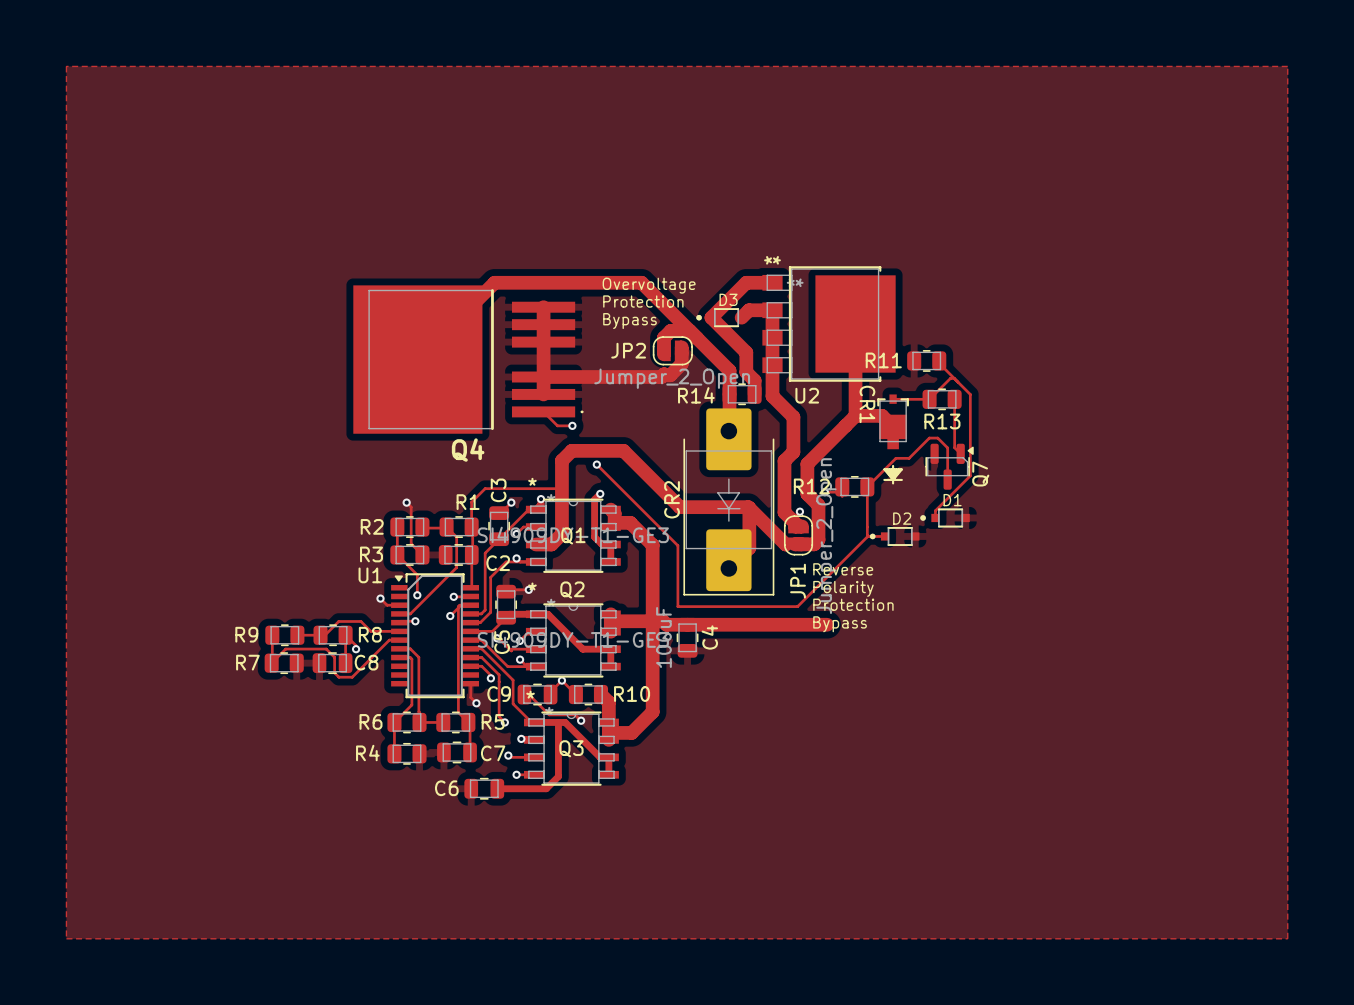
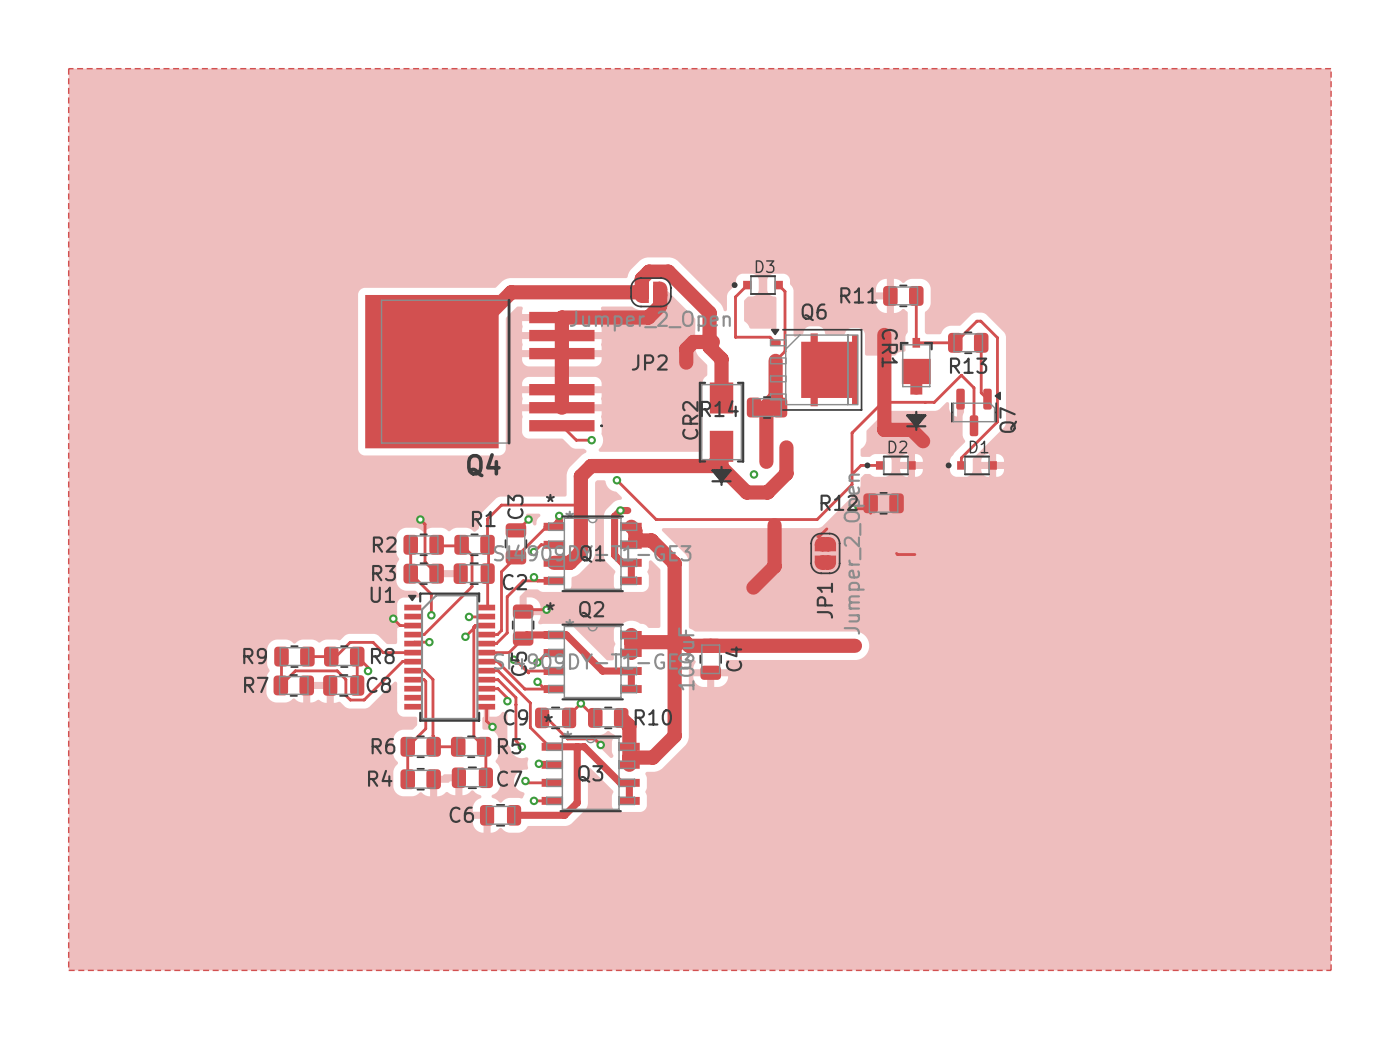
track: none -> (747, 285) (735, 296) (735, 337) (770, 337) (775, 342)
track: none -> (778, 285) (785, 291) (785, 351) (775, 360) (775, 396) (766, 406) (766, 461)
track: (620, 282) (641, 282) (729, 370) (728, 431) -> (641, 292) (641, 278) (648, 271) (668, 271) (709, 312) (709, 347) (721, 359) (721, 397)
track: none -> (660, 292) (660, 305) (648, 317) (561, 317)
track: (772, 282) (746, 282) (711, 317) (746, 352) (746, 372) (754, 380) (754, 394) -> none
text: Overvoltage (649, 285) -> none
track: none -> (916, 295) (916, 342) (955, 342) (976, 321) (980, 321) (997, 337) (997, 421) (961, 457) (961, 465)
text: Protection (643, 301) -> none
D3 position: (721, 317) -> (757, 285)
track: (741, 317) (749, 310) (772, 310) (772, 396) (793, 417) (793, 452) (784, 460) (784, 512) (798, 526) -> none
text: Bypass (630, 321) -> none
U2: (829, 324) -> none
JP2 position: (672, 350) -> (650, 292)
track: (681, 350) (681, 363) (670, 375) (664, 374) (661, 377) (543, 377) -> none
Q6: none -> (816, 369)
R11 position: (926, 360) -> (903, 295)
track: (939, 360) (939, 363) (970, 394) (970, 475) (935, 510) (935, 517) -> none
track: (954, 378) (950, 378) (929, 399) (891, 399) -> none
R13 position: (942, 399) -> (968, 342)
track: (954, 399) (954, 447) (960, 453) -> (981, 342) (981, 392) (987, 399)
CR2 footprint: [683, 408, 775, 596] -> [698, 381, 745, 486]
track: (855, 415) (807, 464) (807, 494) (818, 505) (818, 539) (814, 544) (798, 544) -> none
track: none -> (721, 446) (721, 467) (746, 492) (767, 492) (786, 473) (786, 447)
CR1 position: (893, 439) -> (916, 384)
track: (623, 450) (679, 507) (748, 507) (785, 544) -> (644, 466) (712, 466) (721, 456)
track: none -> (880, 465) (861, 465) (852, 474)
via: none -> (753, 474)
Q7 position: (949, 466) -> (975, 412)
track: (947, 479) (947, 447) (937, 438) (929, 438) (909, 458) (895, 458) (867, 486) (867, 536) (797, 606) (677, 606) (677, 545) (634, 502) -> (974, 425) (974, 387) (961, 375) (934, 402) (882, 402) (852, 432) (852, 484) (817, 519) (656, 519)
track: none -> (620, 510) (627, 510)
CR2 name position: CR2 (672, 499) -> CR2 (690, 420)
via: (799, 511) -> none
D1 position: (945, 517) -> (971, 465)
D2 position: (894, 536) -> (890, 465)
text: Reverse (843, 569) -> none
text: Polarity (843, 588) -> none
text: Protection (853, 604) -> none
text: Bypass (840, 624) -> none

